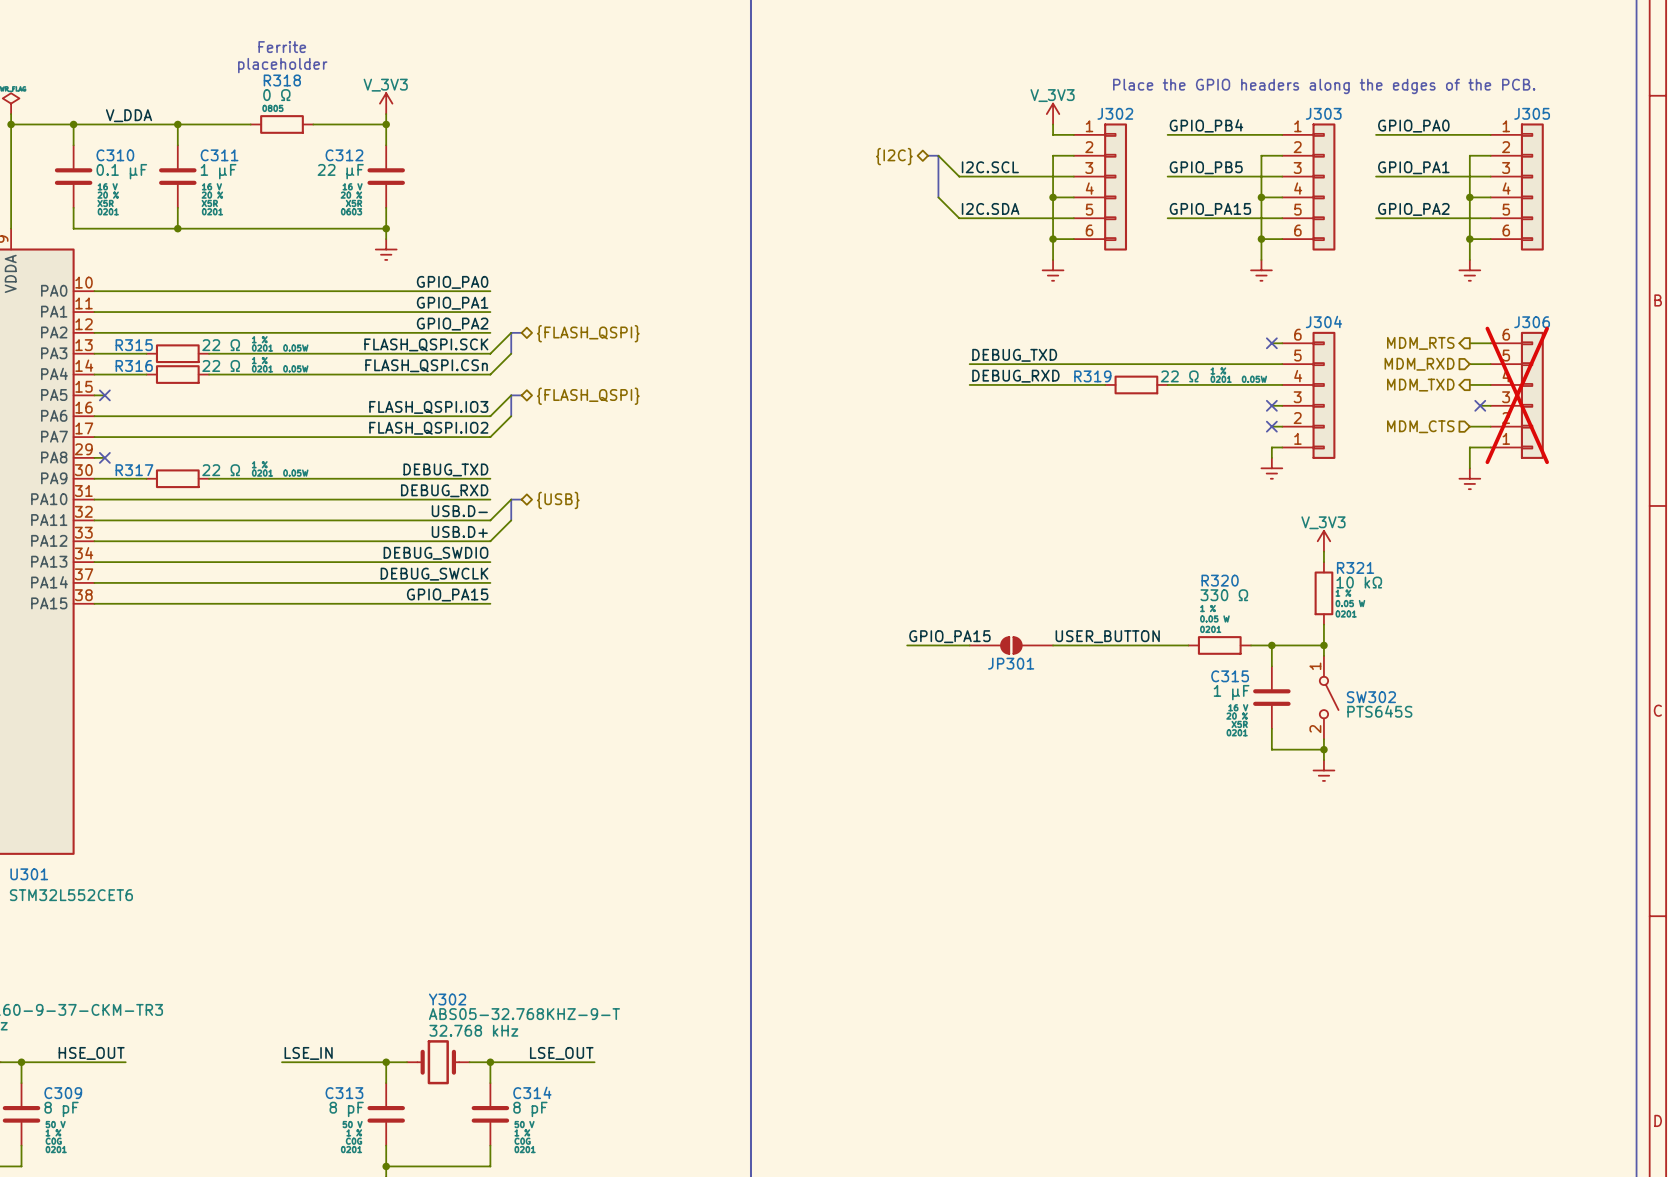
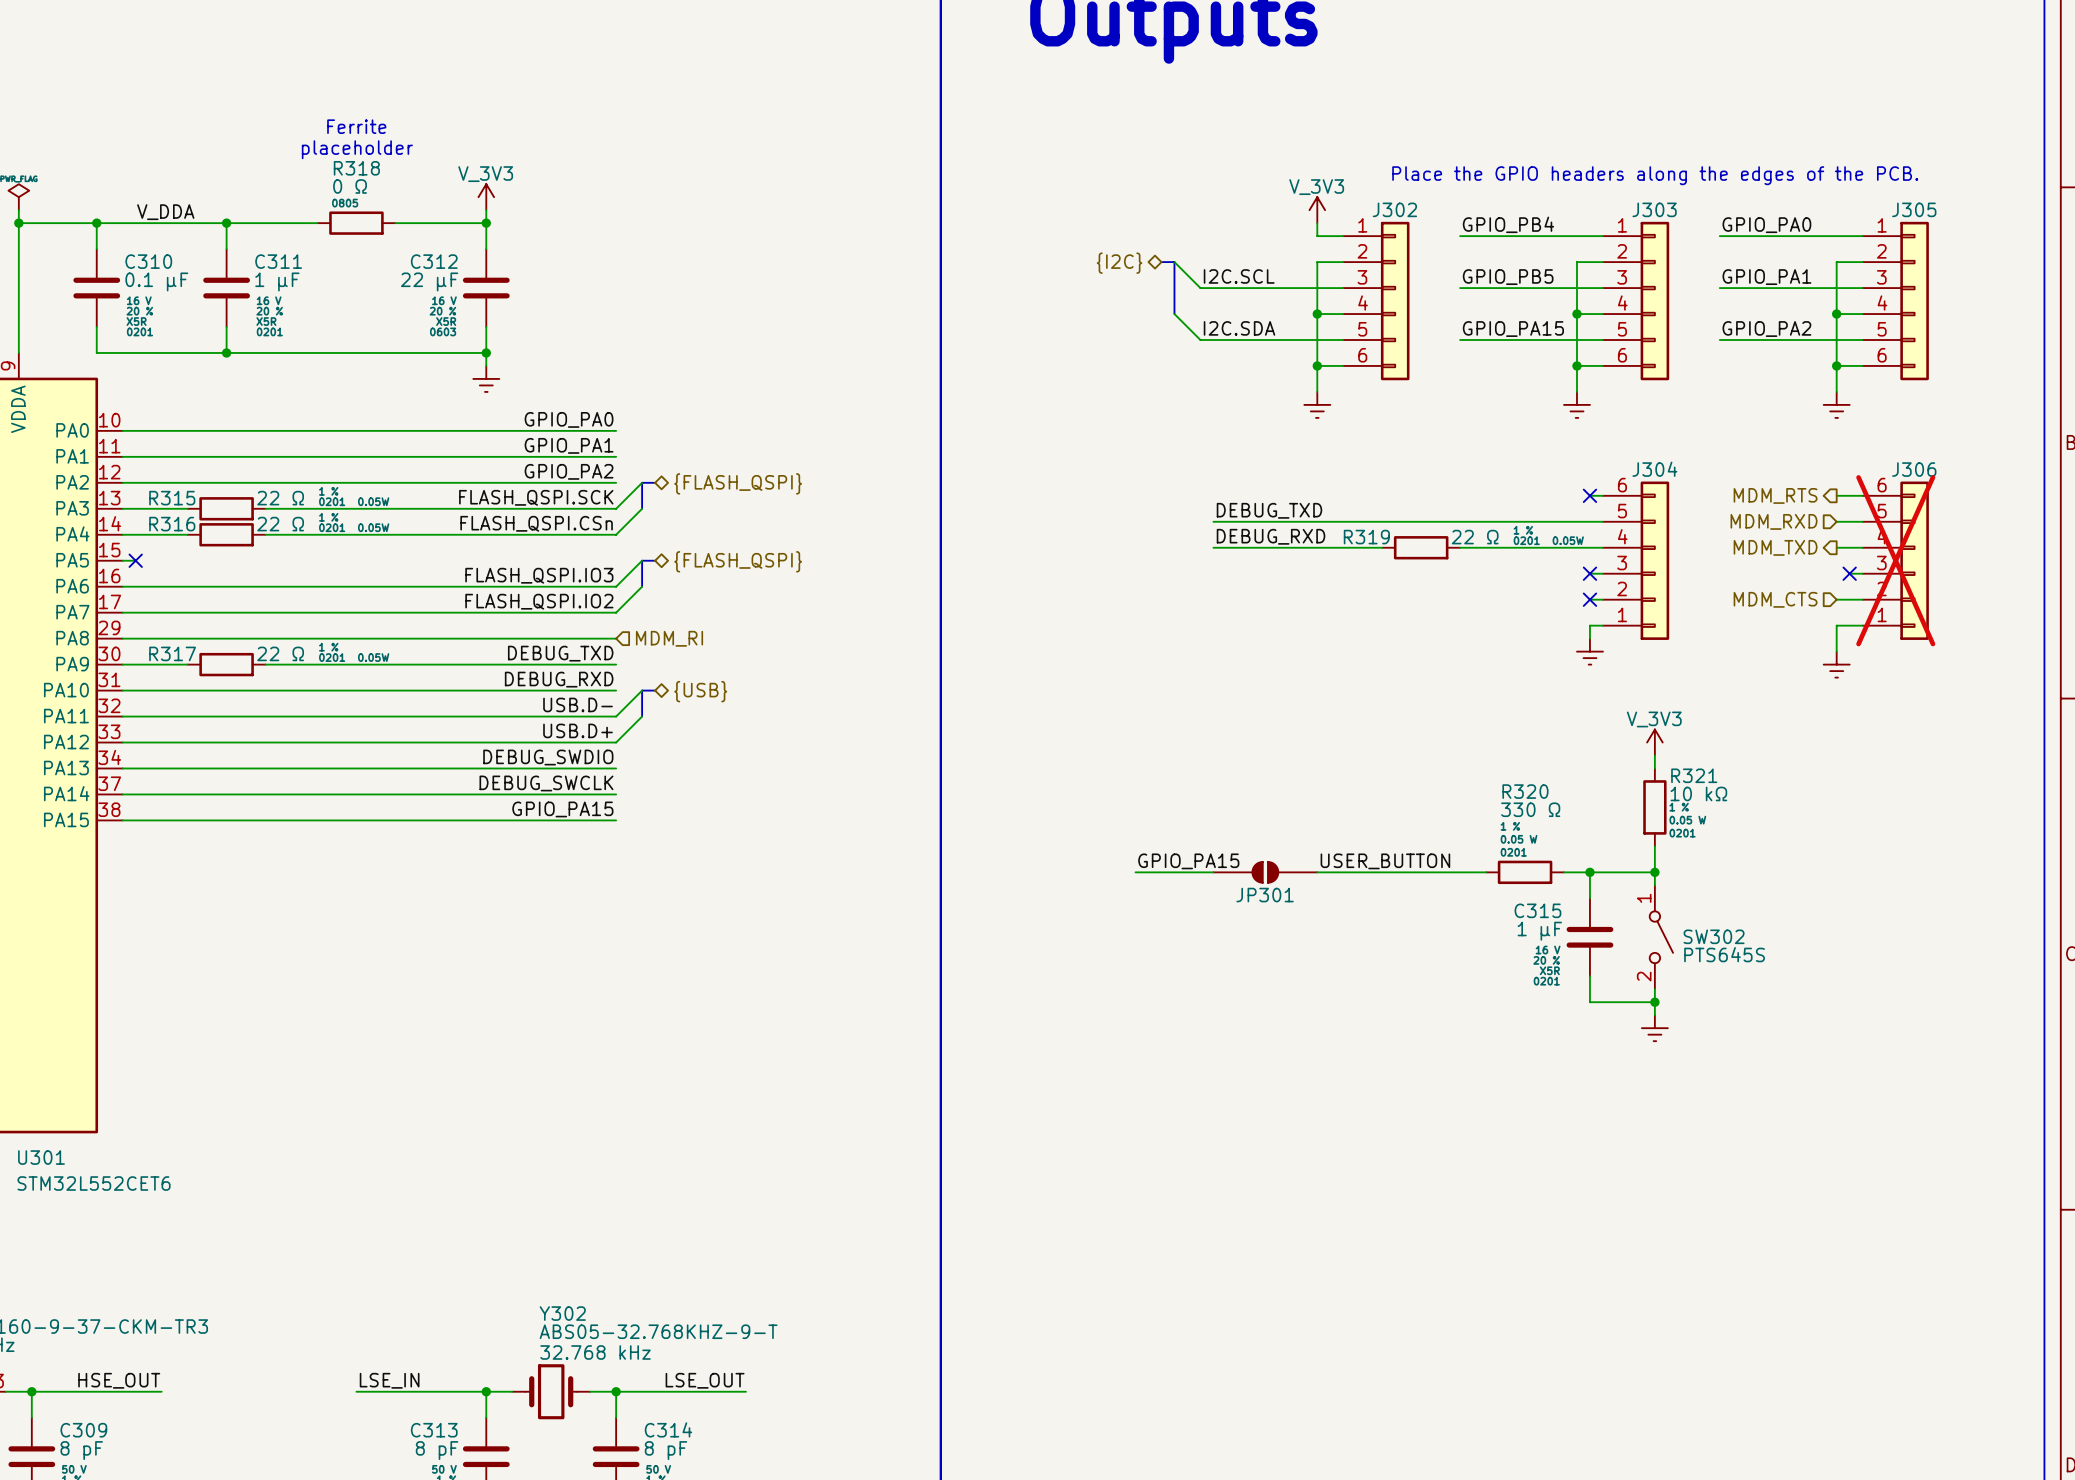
wire: none -> (135, 638) (616, 638)
no-connect mark: (104, 457) -> none
hierarchical label: none -> MDM_RI (669, 638)

